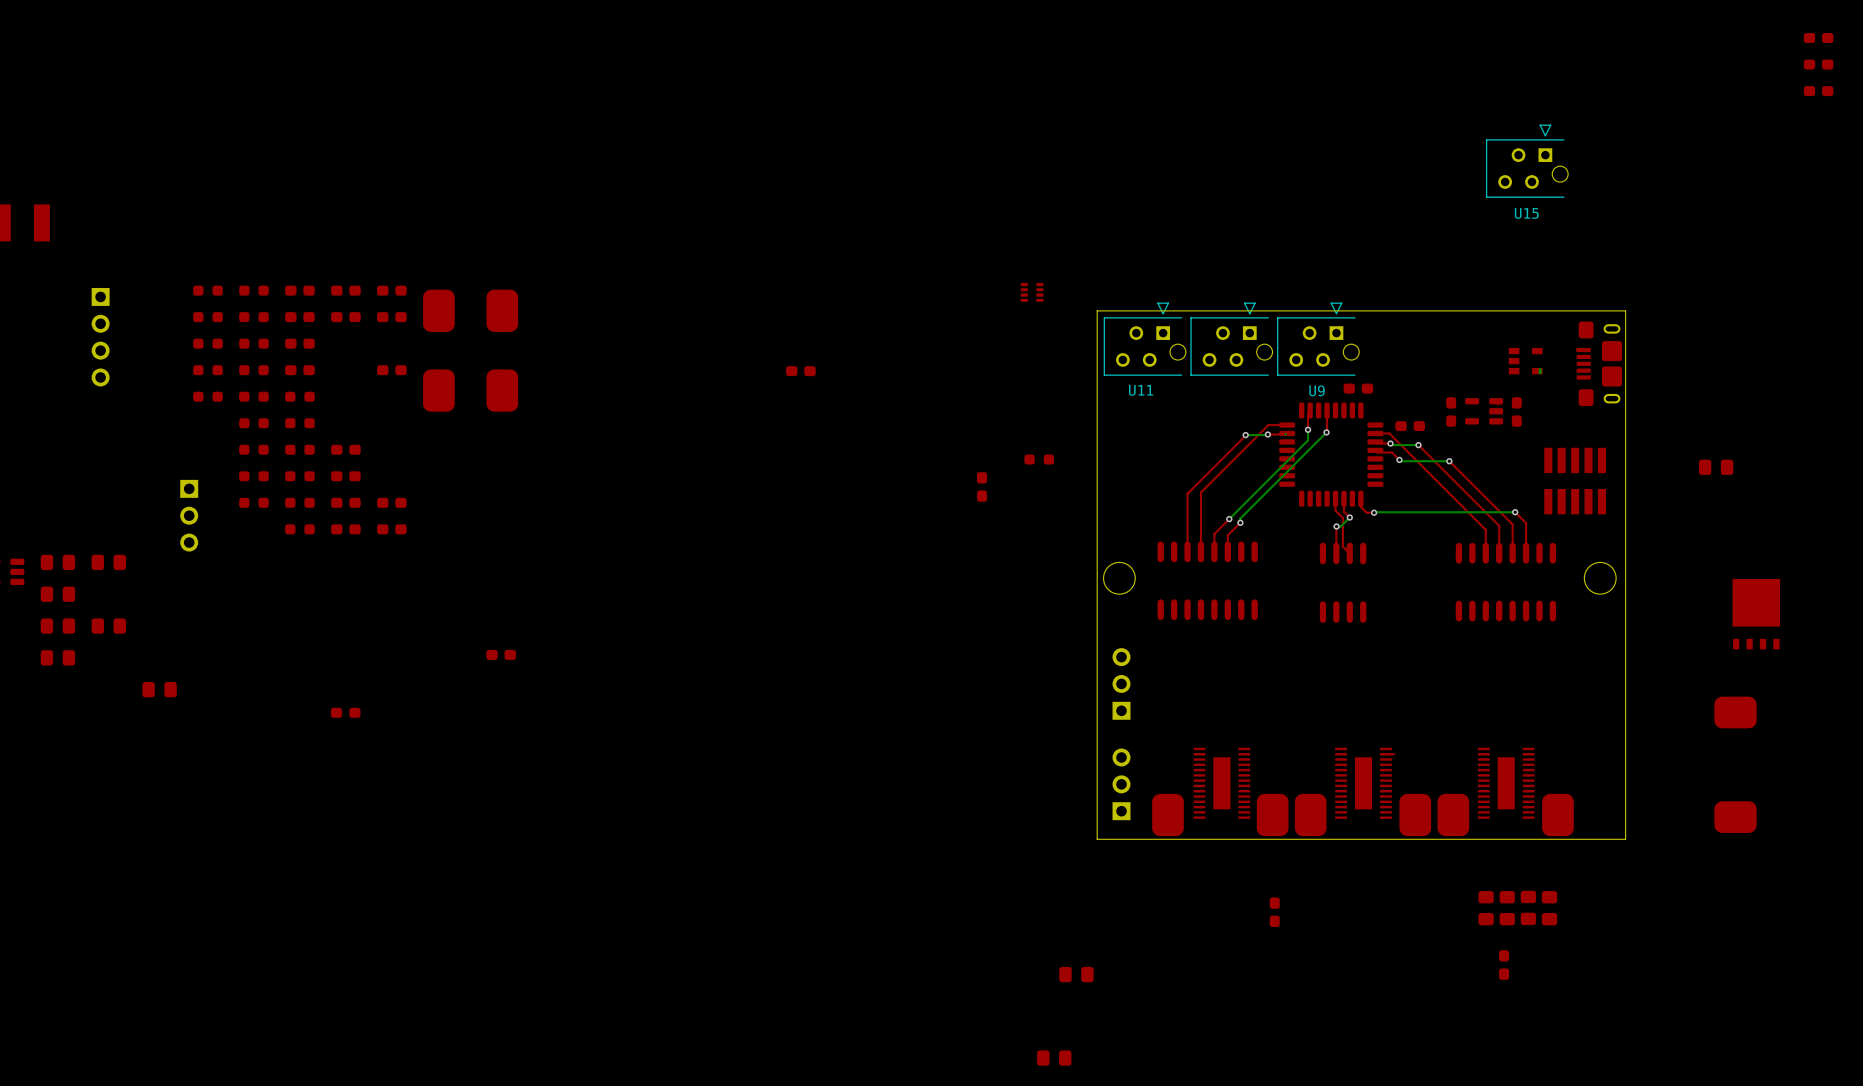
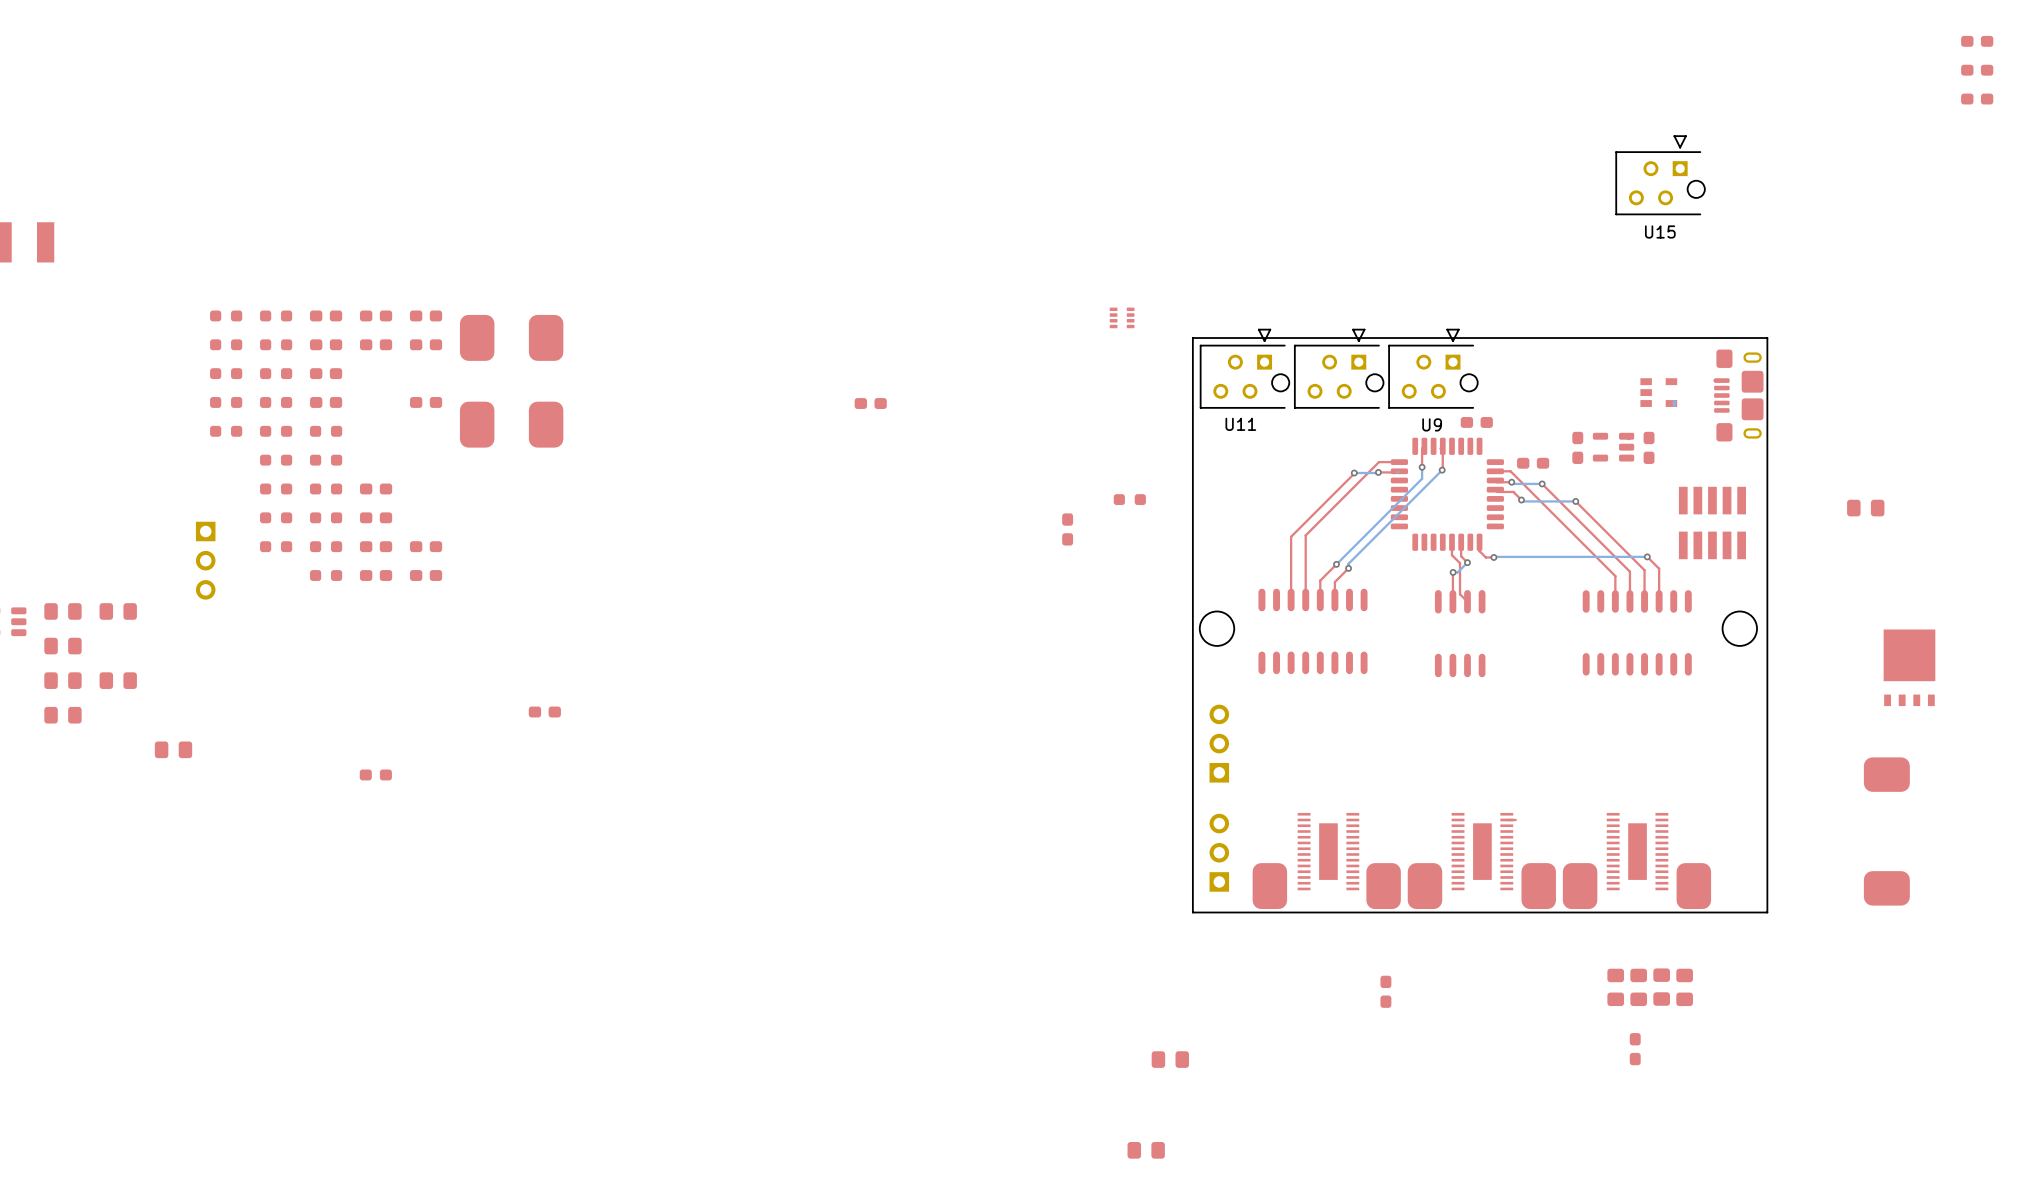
part: (100, 337) -> none

